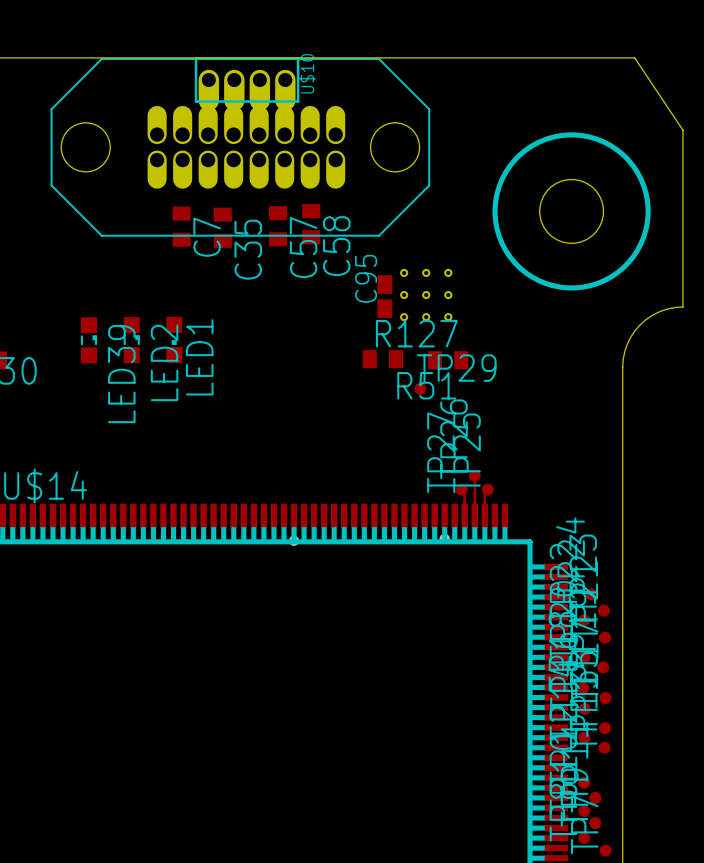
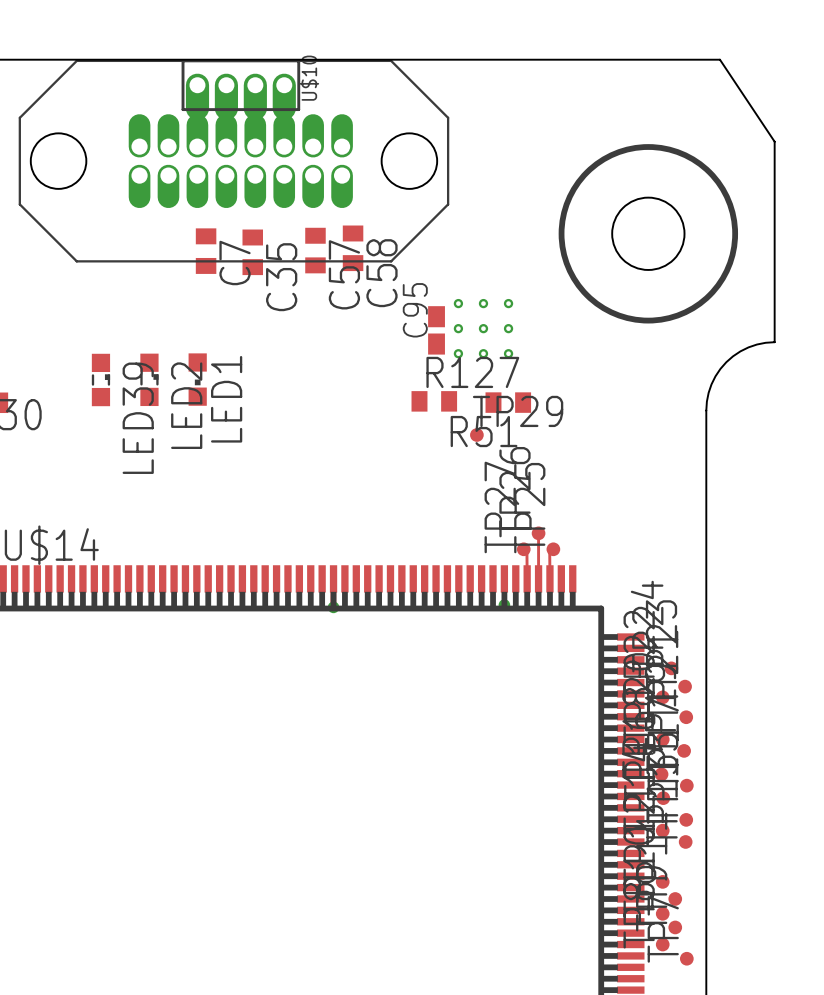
U$10 position: (247, 83) -> (240, 89)
part position: (240, 147) -> (233, 161)

